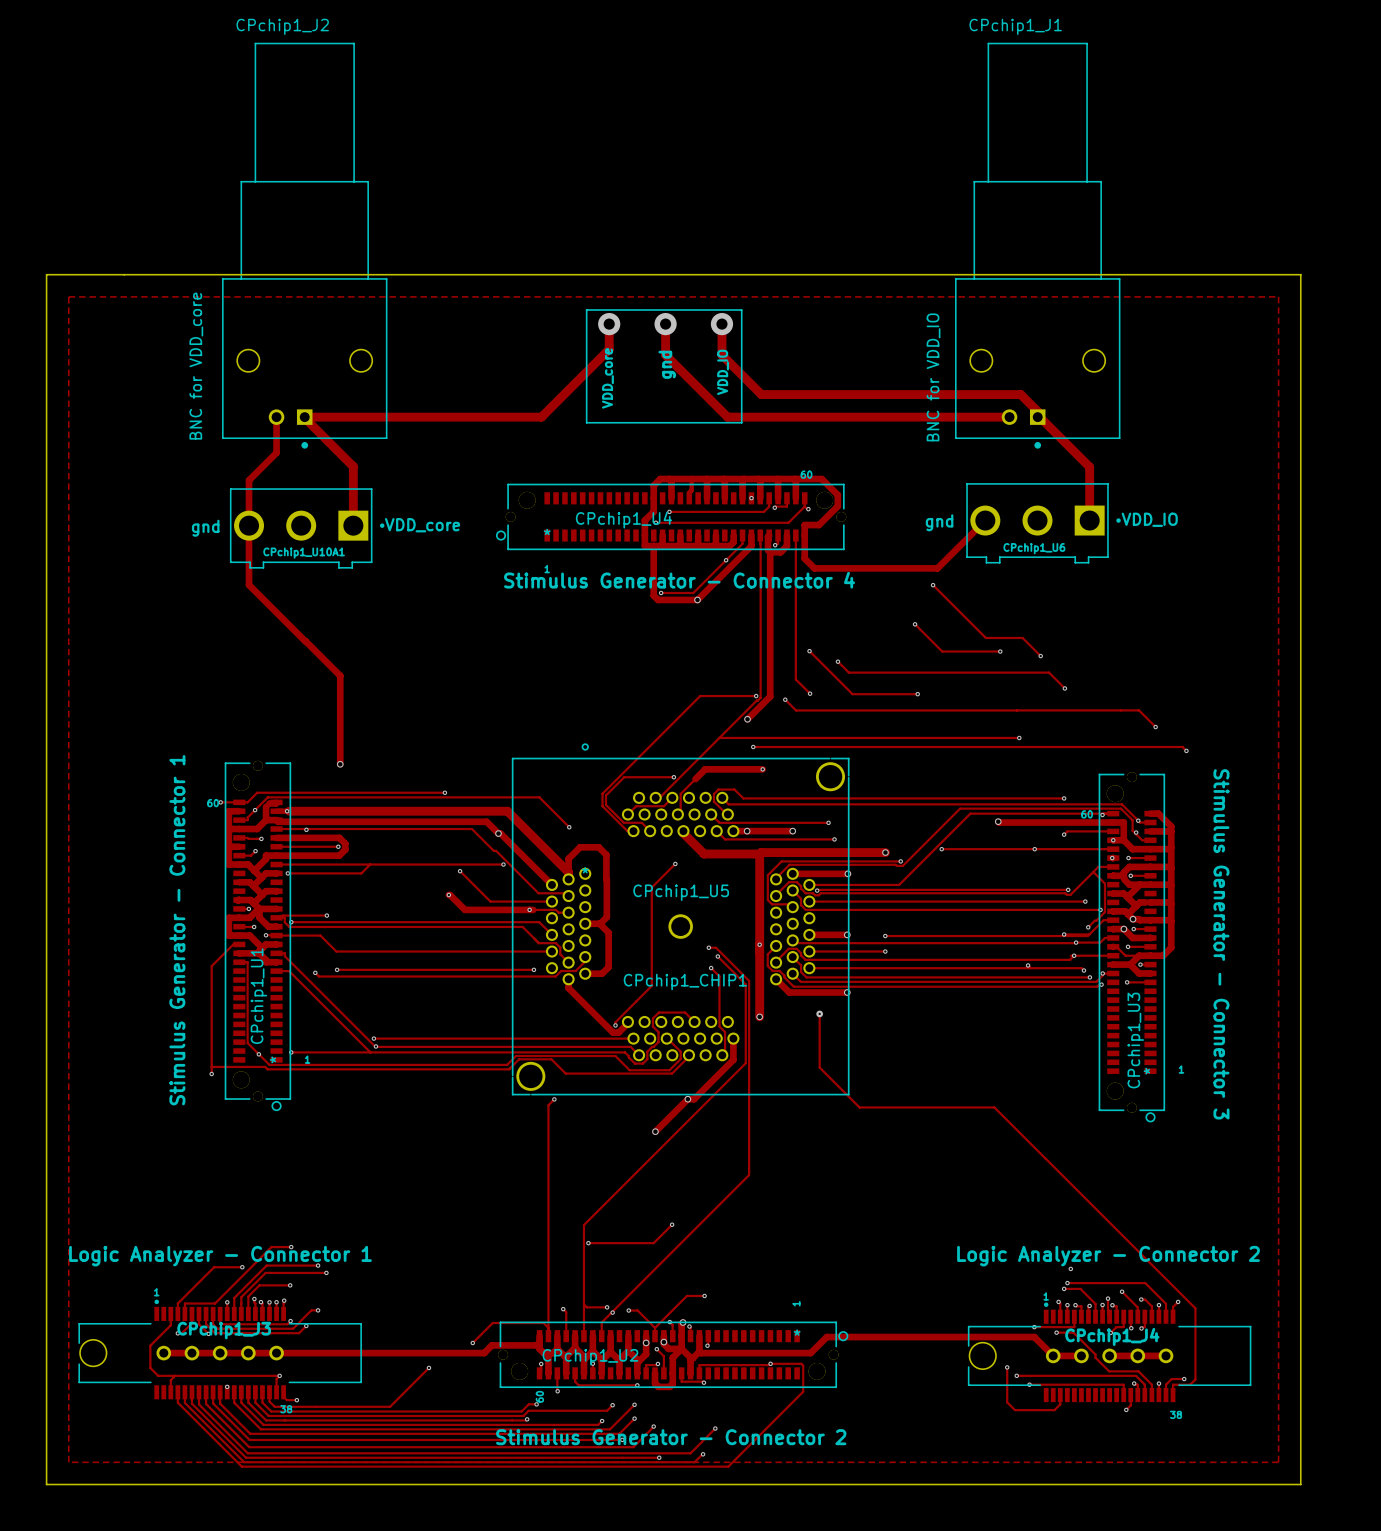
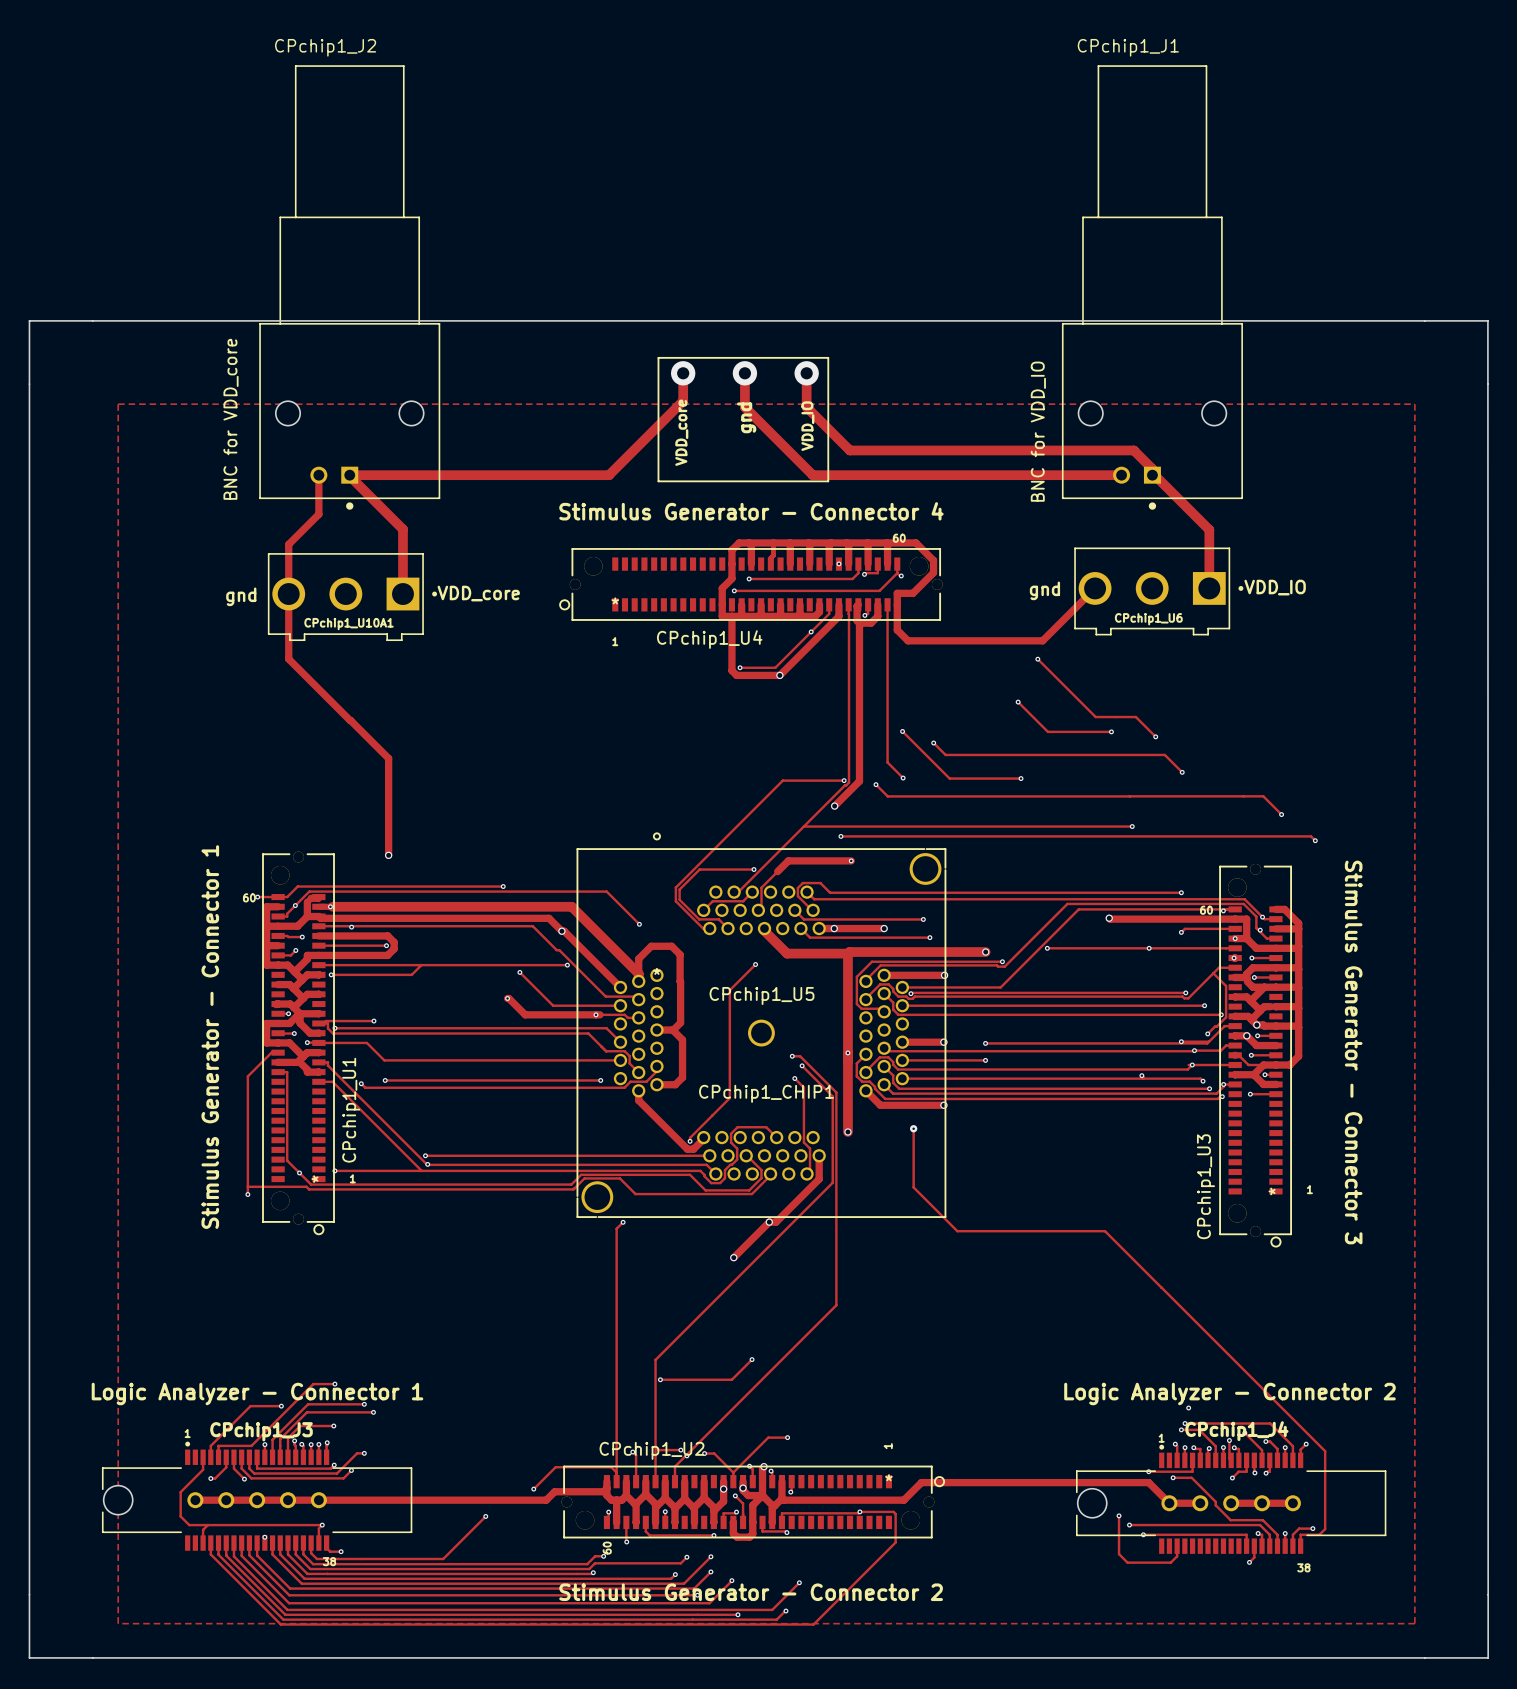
board edge: (46, 274) (46, 1484) (1300, 1484) (1300, 274) (46, 274) -> (29, 320) (29, 1657) (1488, 1657) (1487, 320) (29, 320)
zone outline: (68, 296) (68, 1462) (1278, 1462) (1278, 296) (68, 296) -> (118, 404) (118, 1623) (1414, 1623) (1414, 404) (118, 404)
CPchip1_U4 name position: CPchip1_U4 (623, 520) -> CPchip1_U4 (709, 639)
text position: Stimulus Generator - Connector 4 (679, 580) -> Stimulus Generator - Connector 4 (751, 511)
CPchip1_U1 name position: CPchip1_U1 (258, 996) -> CPchip1_U1 (351, 1110)
CPchip1_U3 name position: CPchip1_U3 (1135, 1040) -> CPchip1_U3 (1205, 1186)
CPchip1_J3 name position: CPchip1_J3 (224, 1330) -> CPchip1_J3 (261, 1431)
CPchip1_J4 name position: CPchip1_J4 (1112, 1336) -> CPchip1_J4 (1236, 1431)
CPchip1_U2 name position: CPchip1_U2 (590, 1357) -> CPchip1_U2 (651, 1450)

